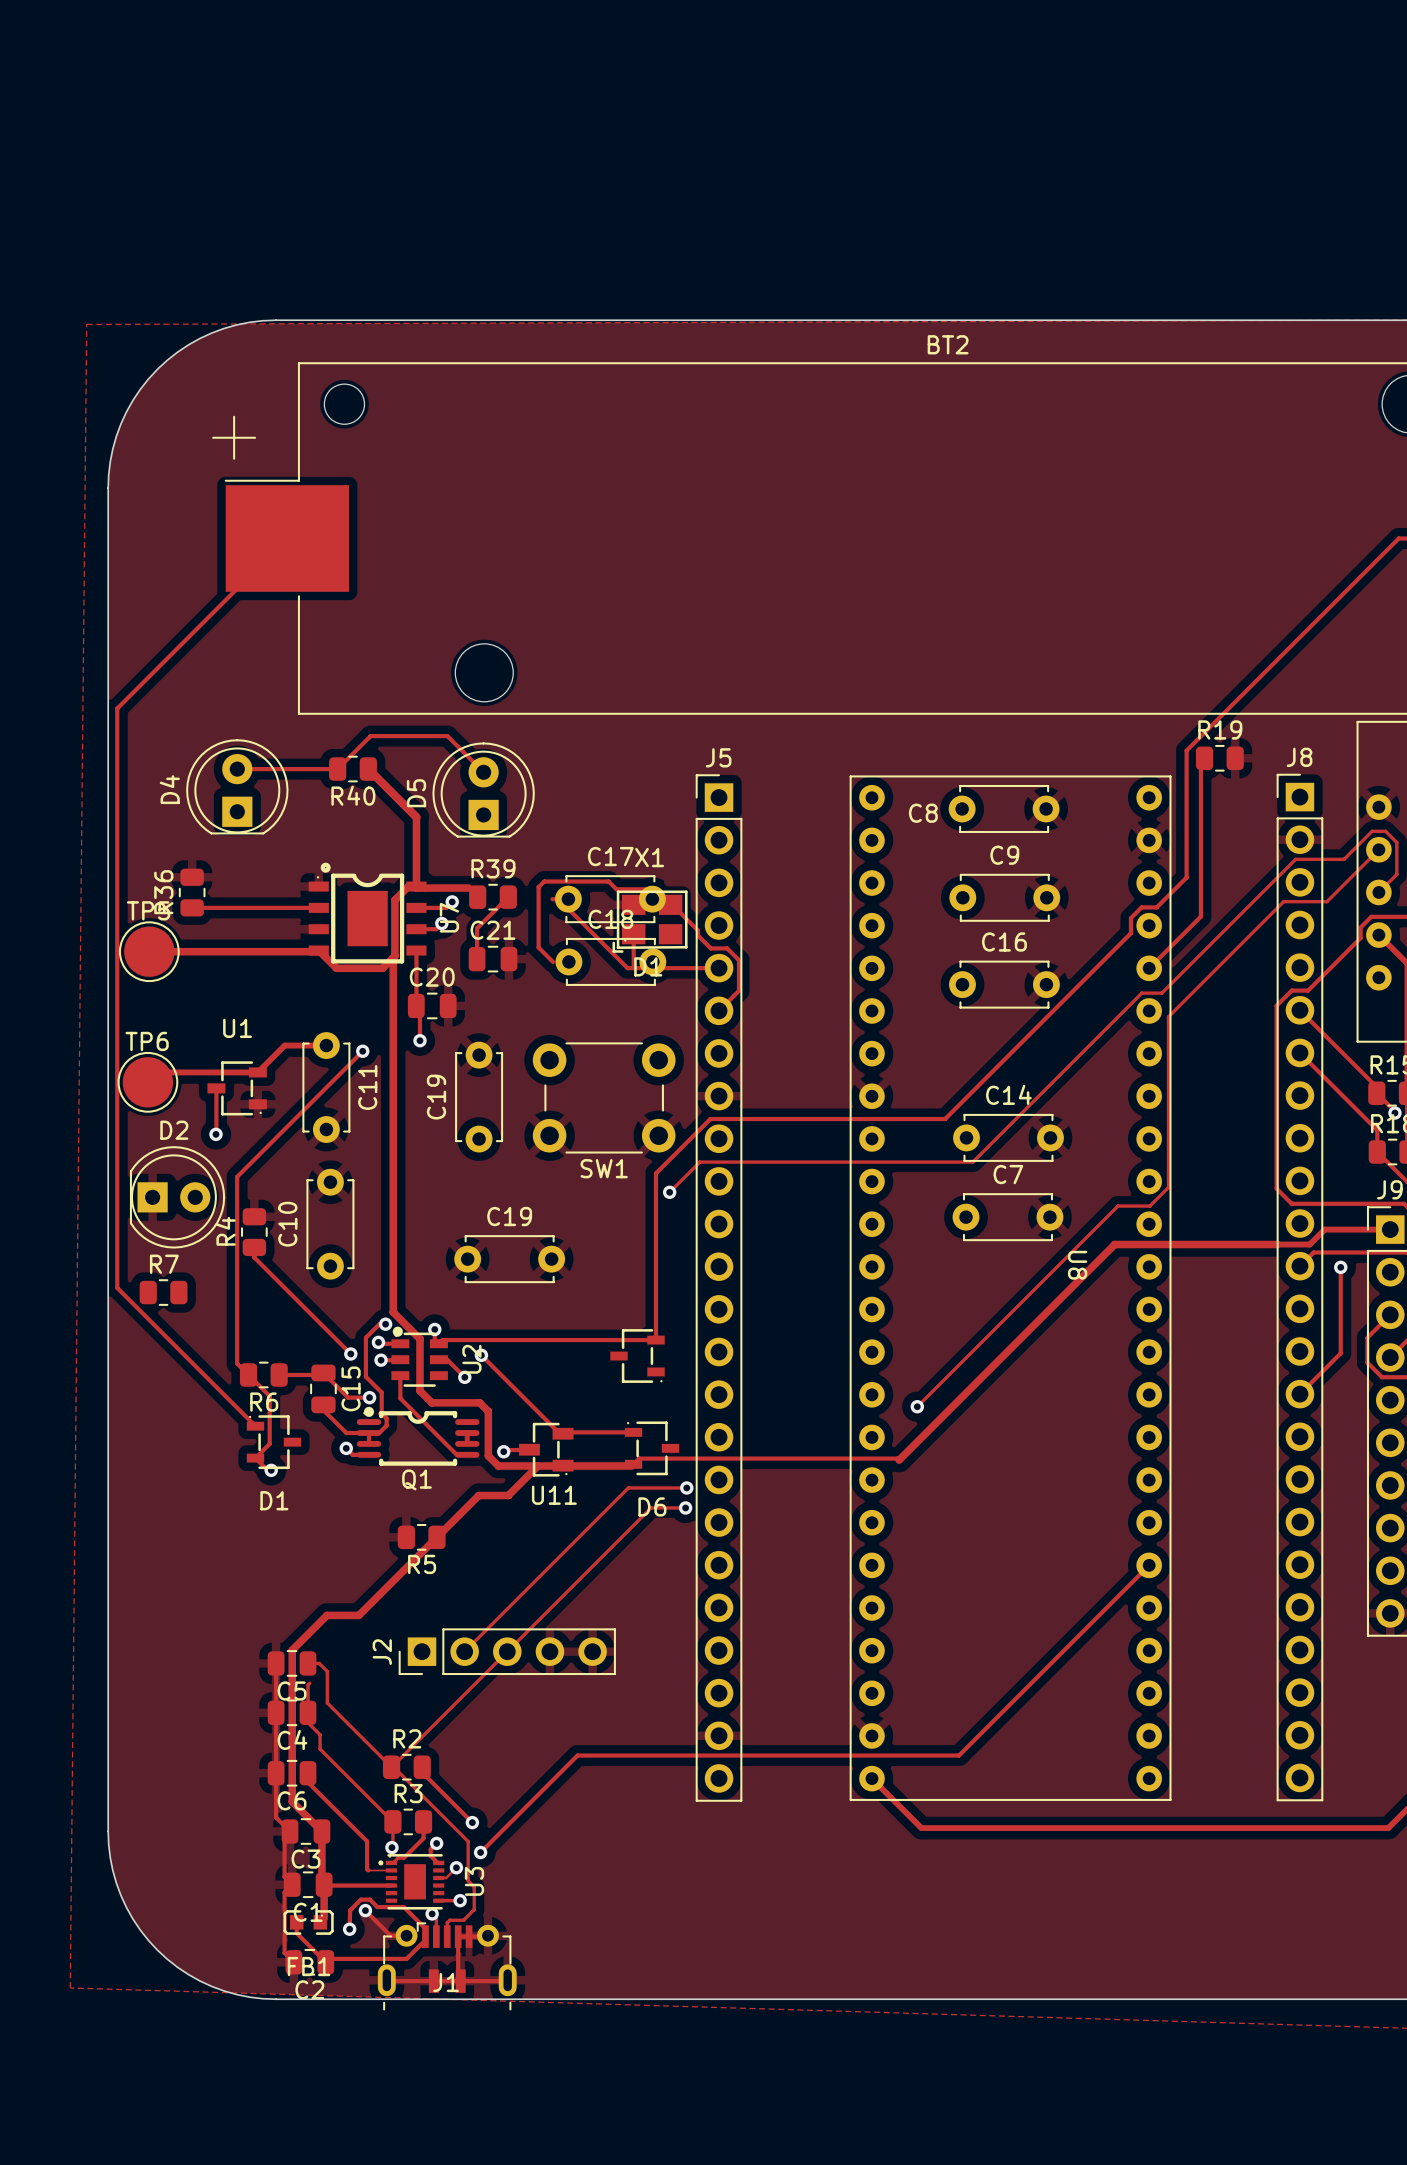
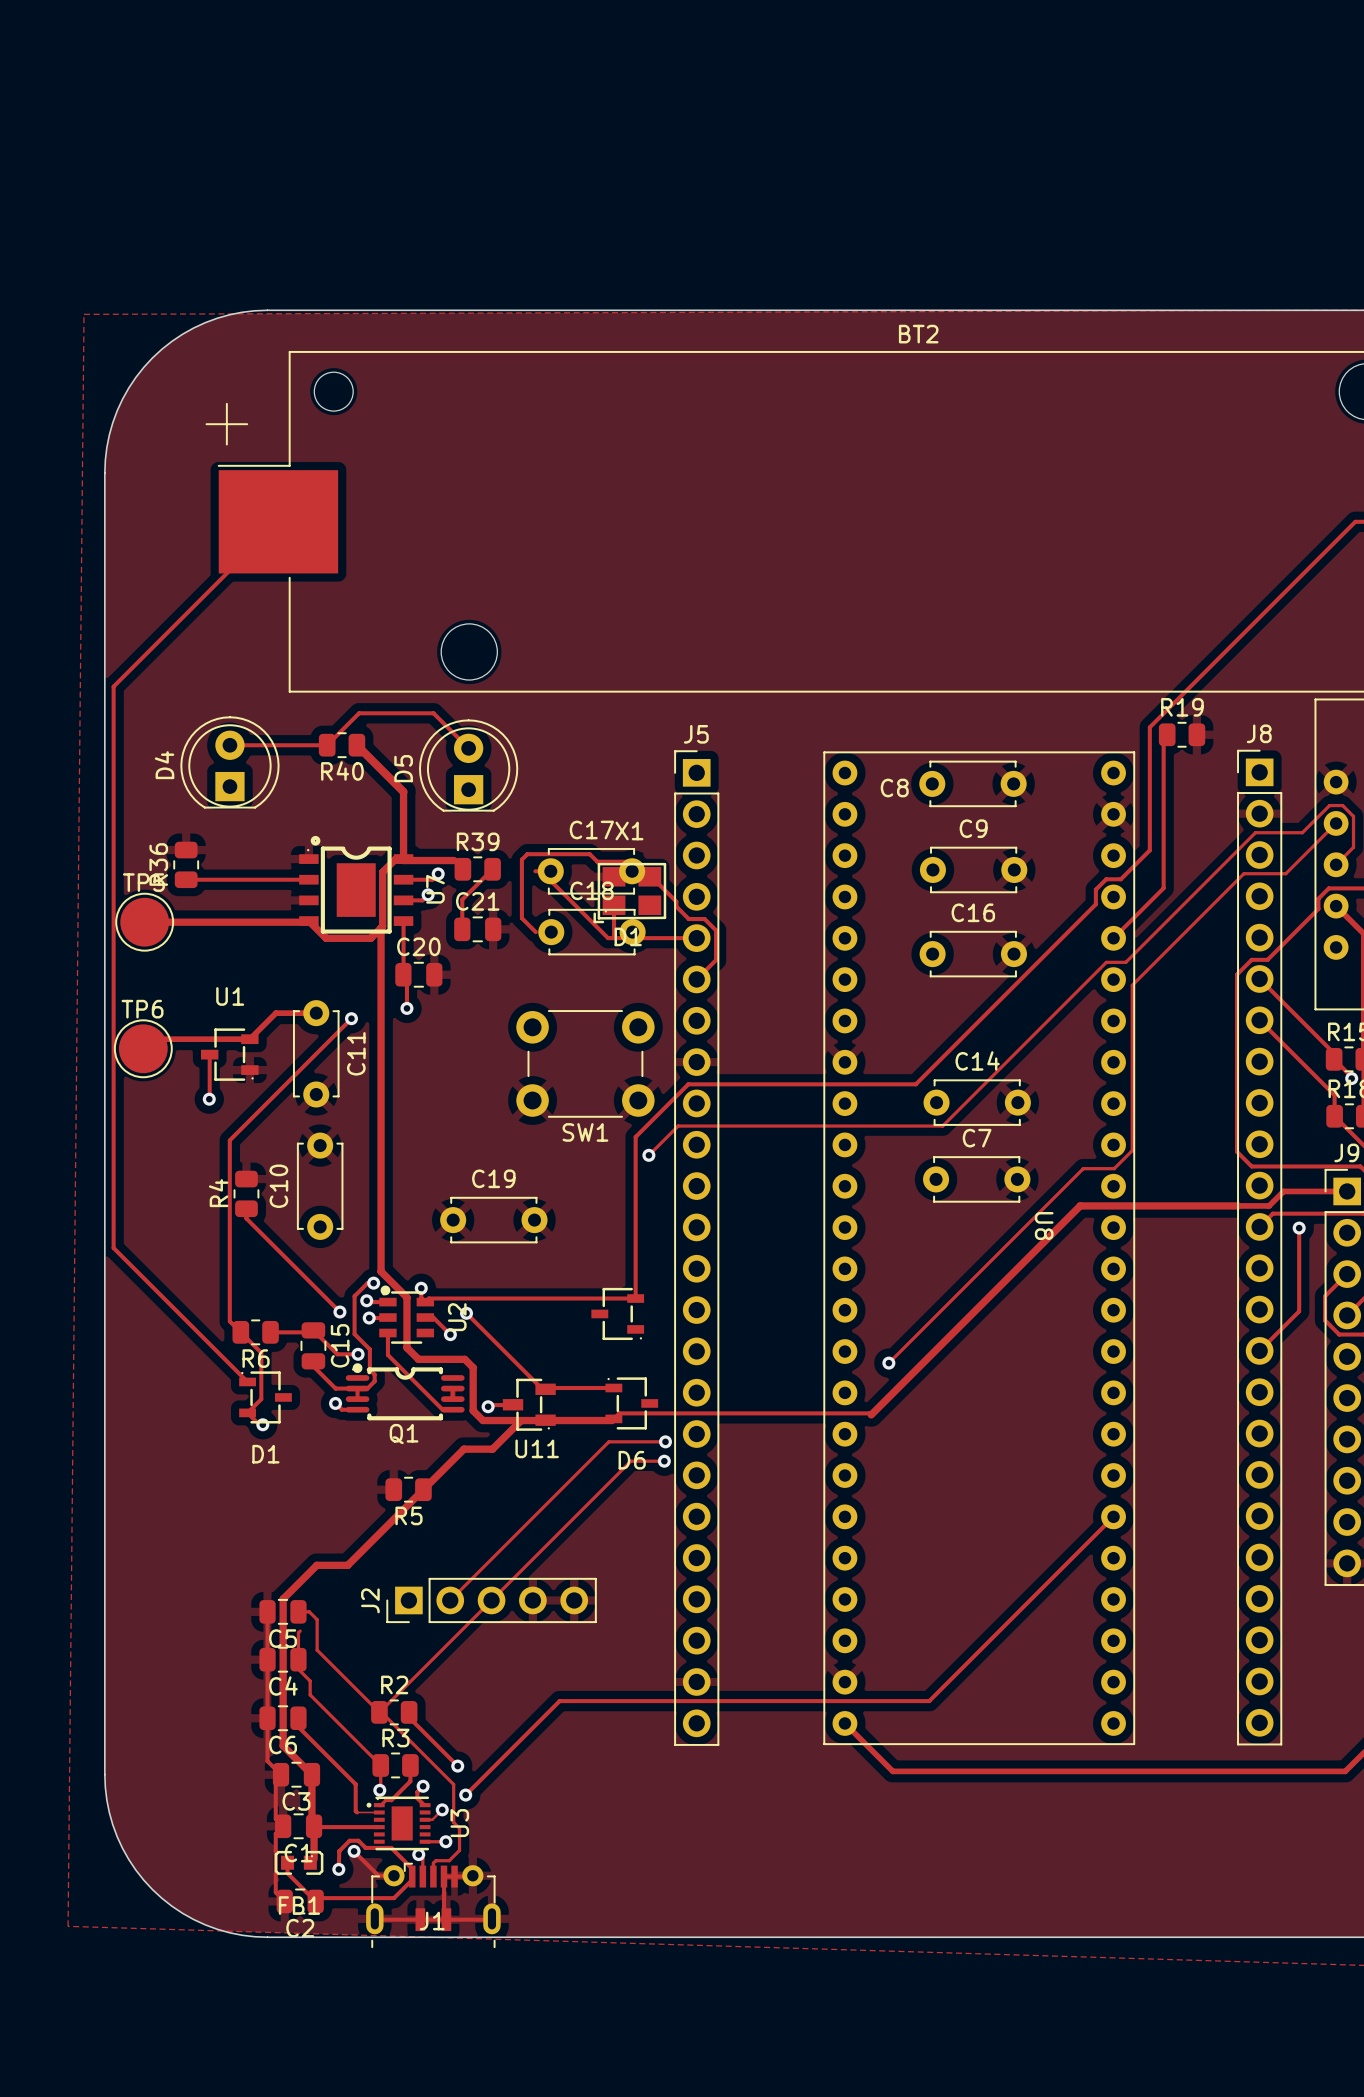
C19: (479, 1097) -> none
D2: (177, 1197) -> none
R7: (163, 1292) -> none

